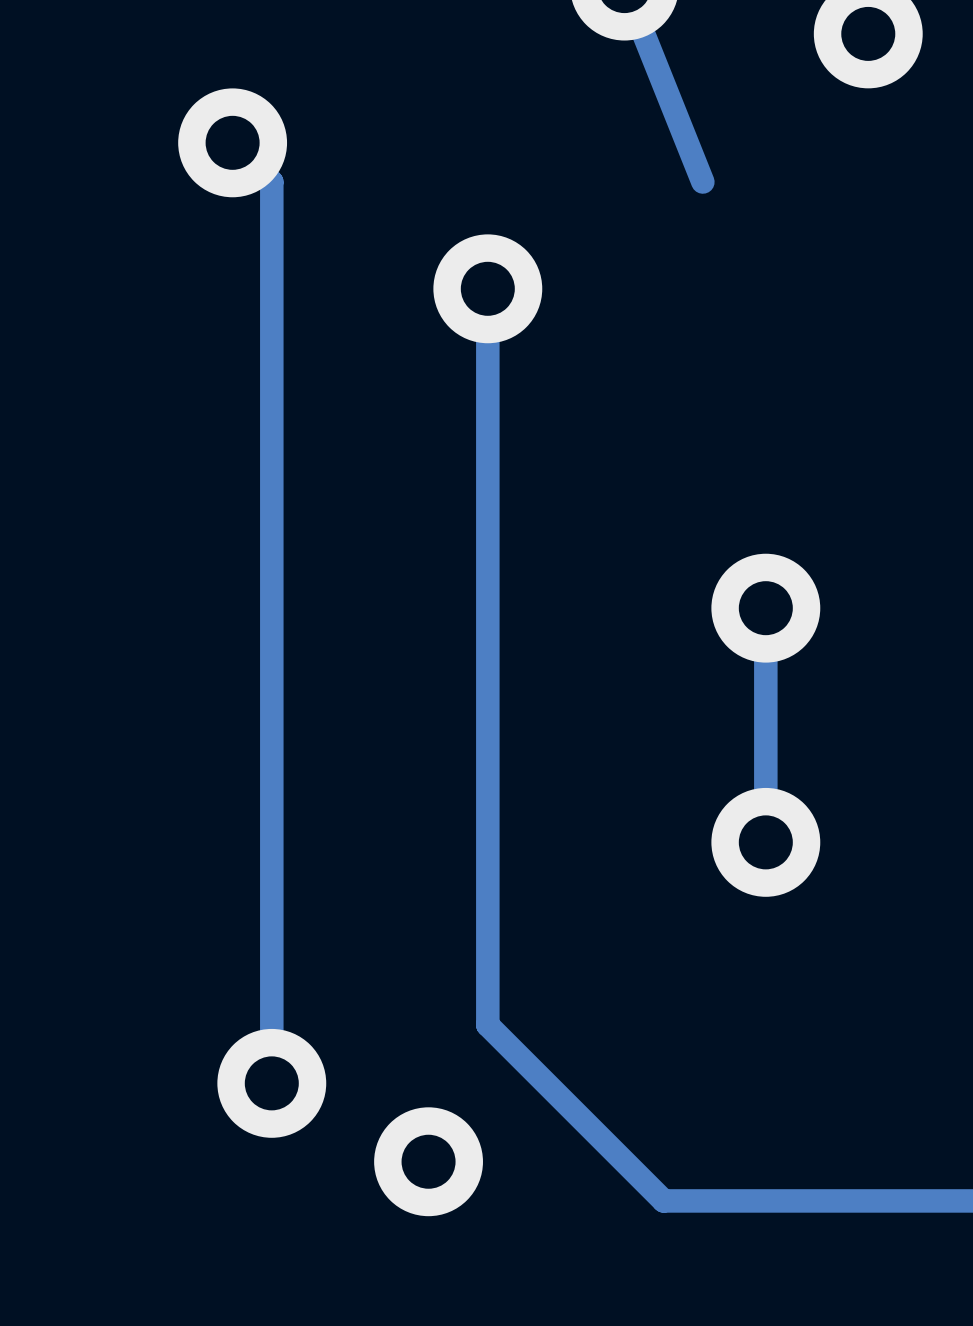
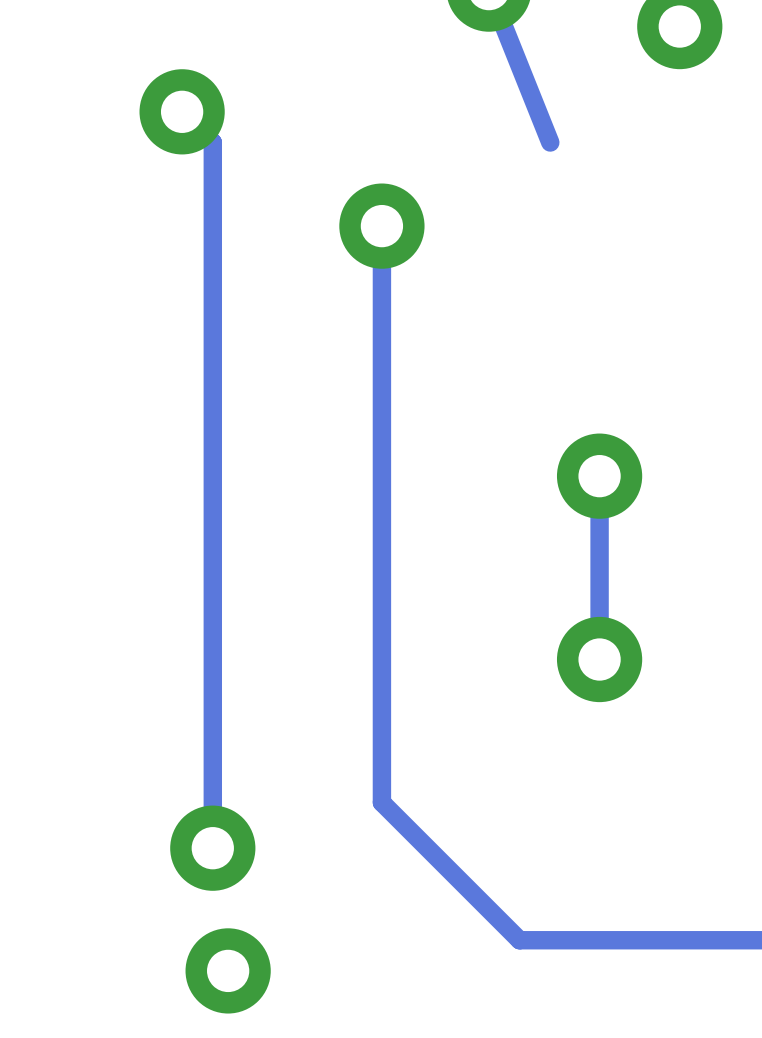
via position: (428, 1161) -> (228, 970)

